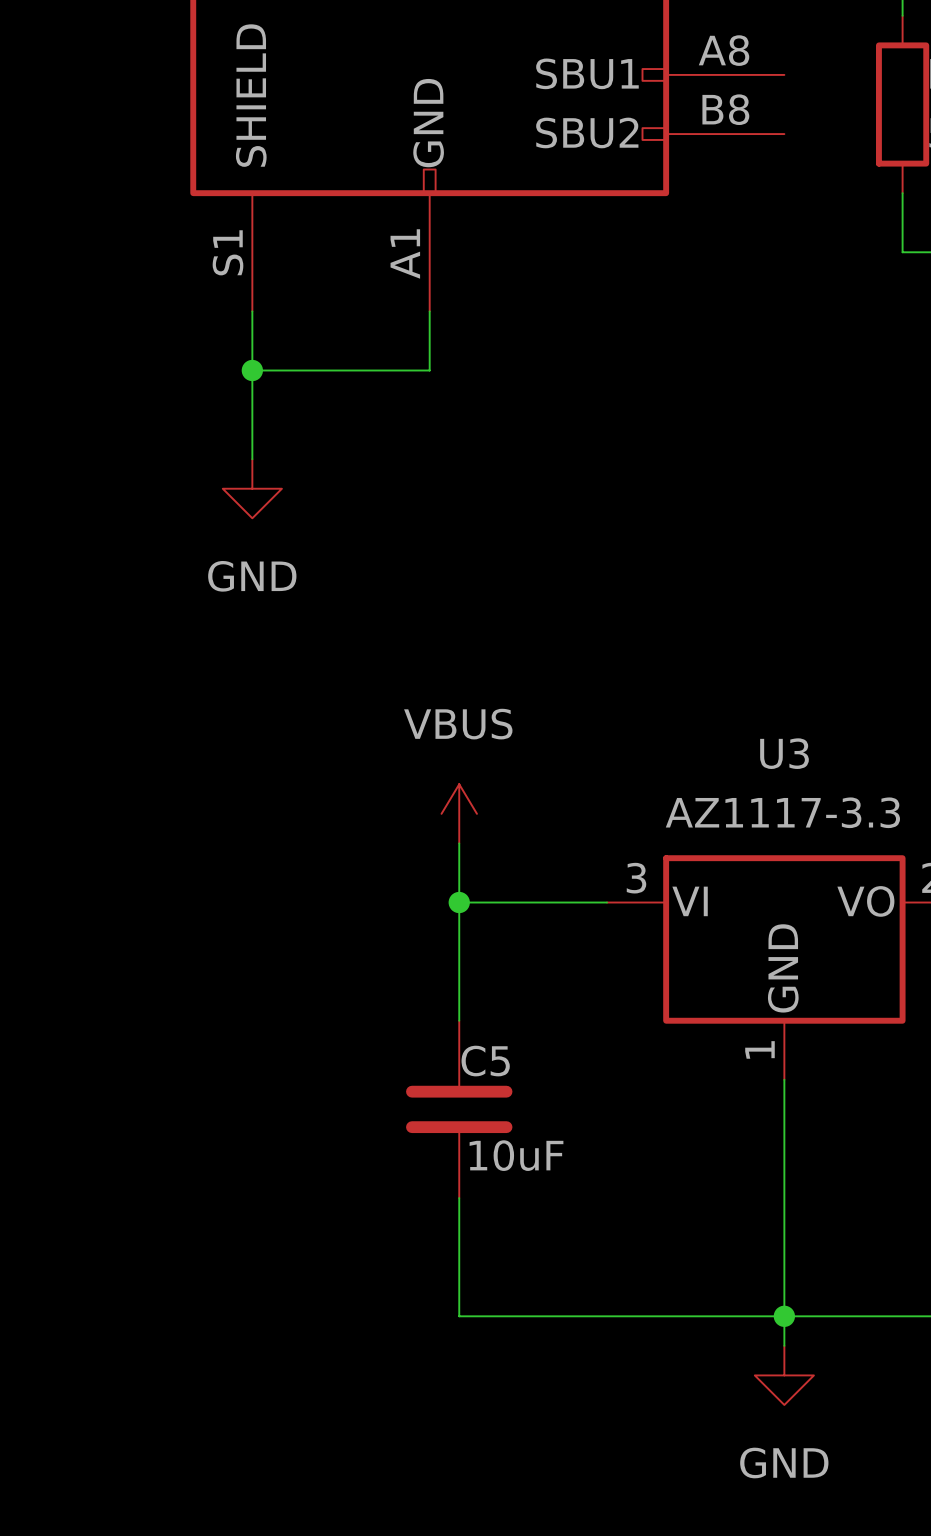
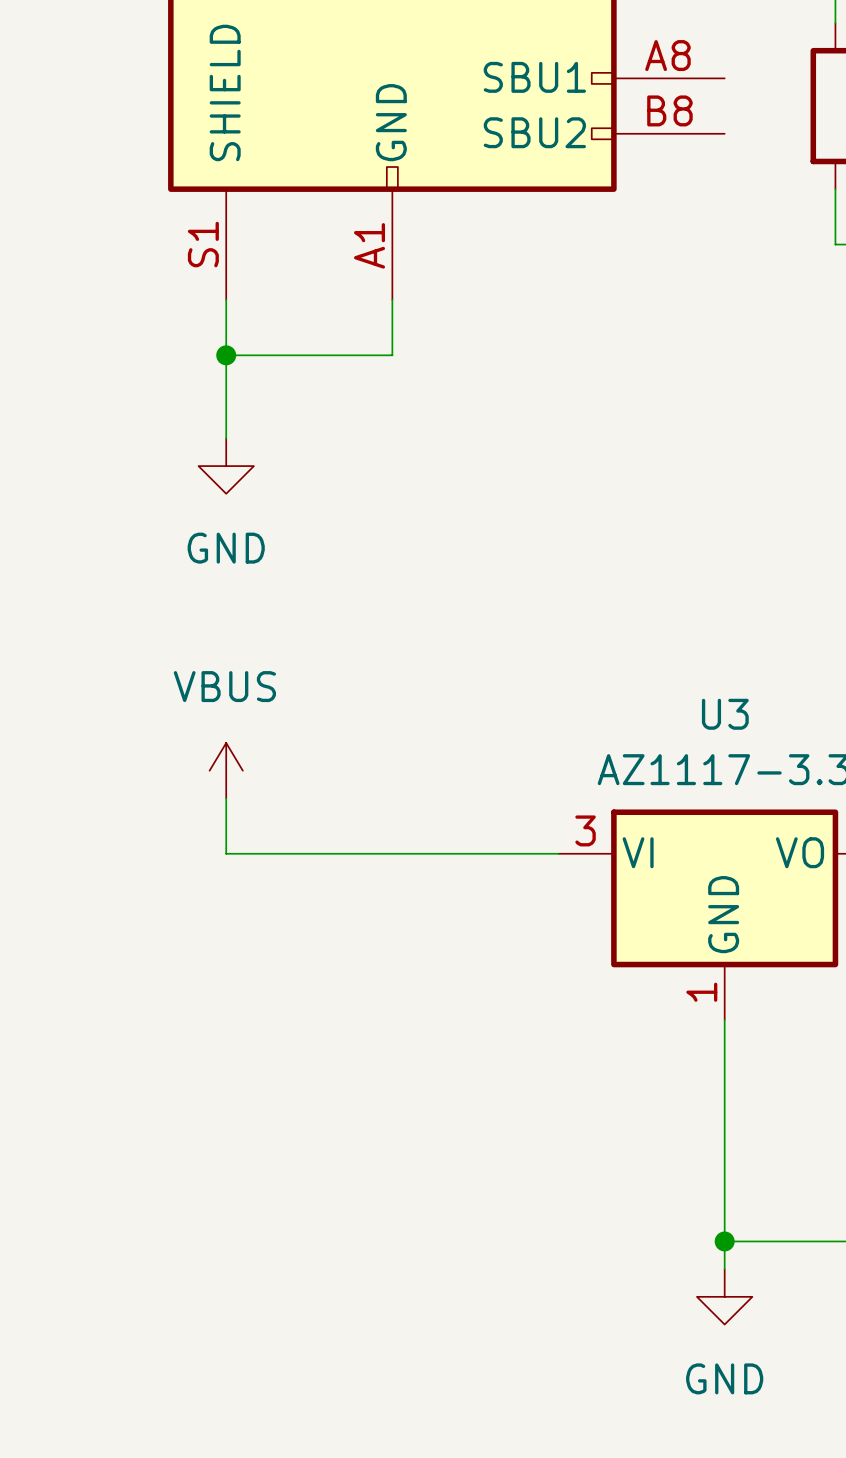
power symbol position: VBUS (459, 813) -> VBUS (226, 770)
wire: none -> (226, 798) (226, 853) (420, 853)
wire: (459, 843) (459, 1020) -> none
junction: (459, 902) -> none
C5: 10uF (459, 1109) -> none
wire: (459, 1198) (459, 1316) (784, 1316) -> none

